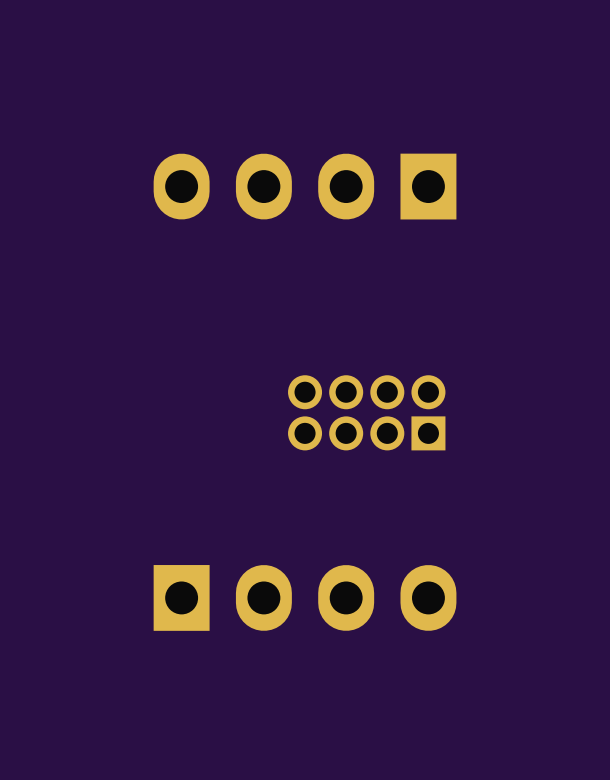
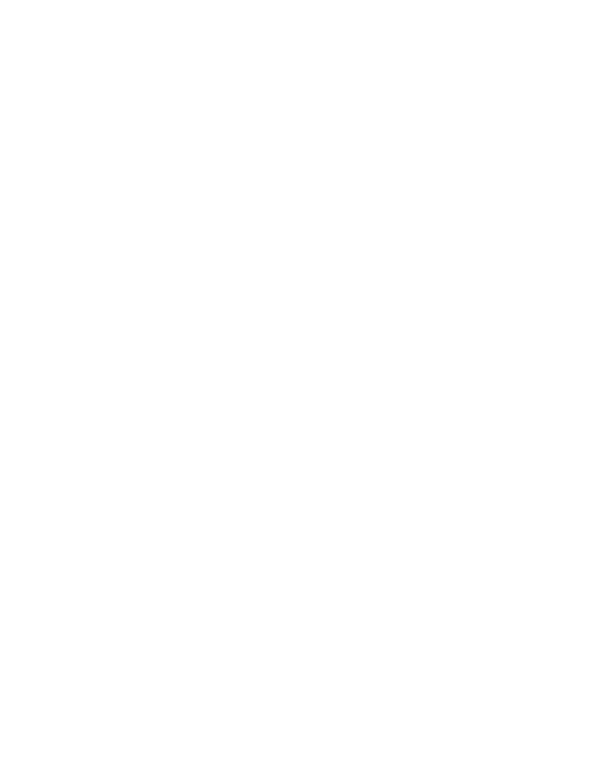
part: (305, 186) -> none
part: (366, 412) -> none
part: (305, 597) -> none

